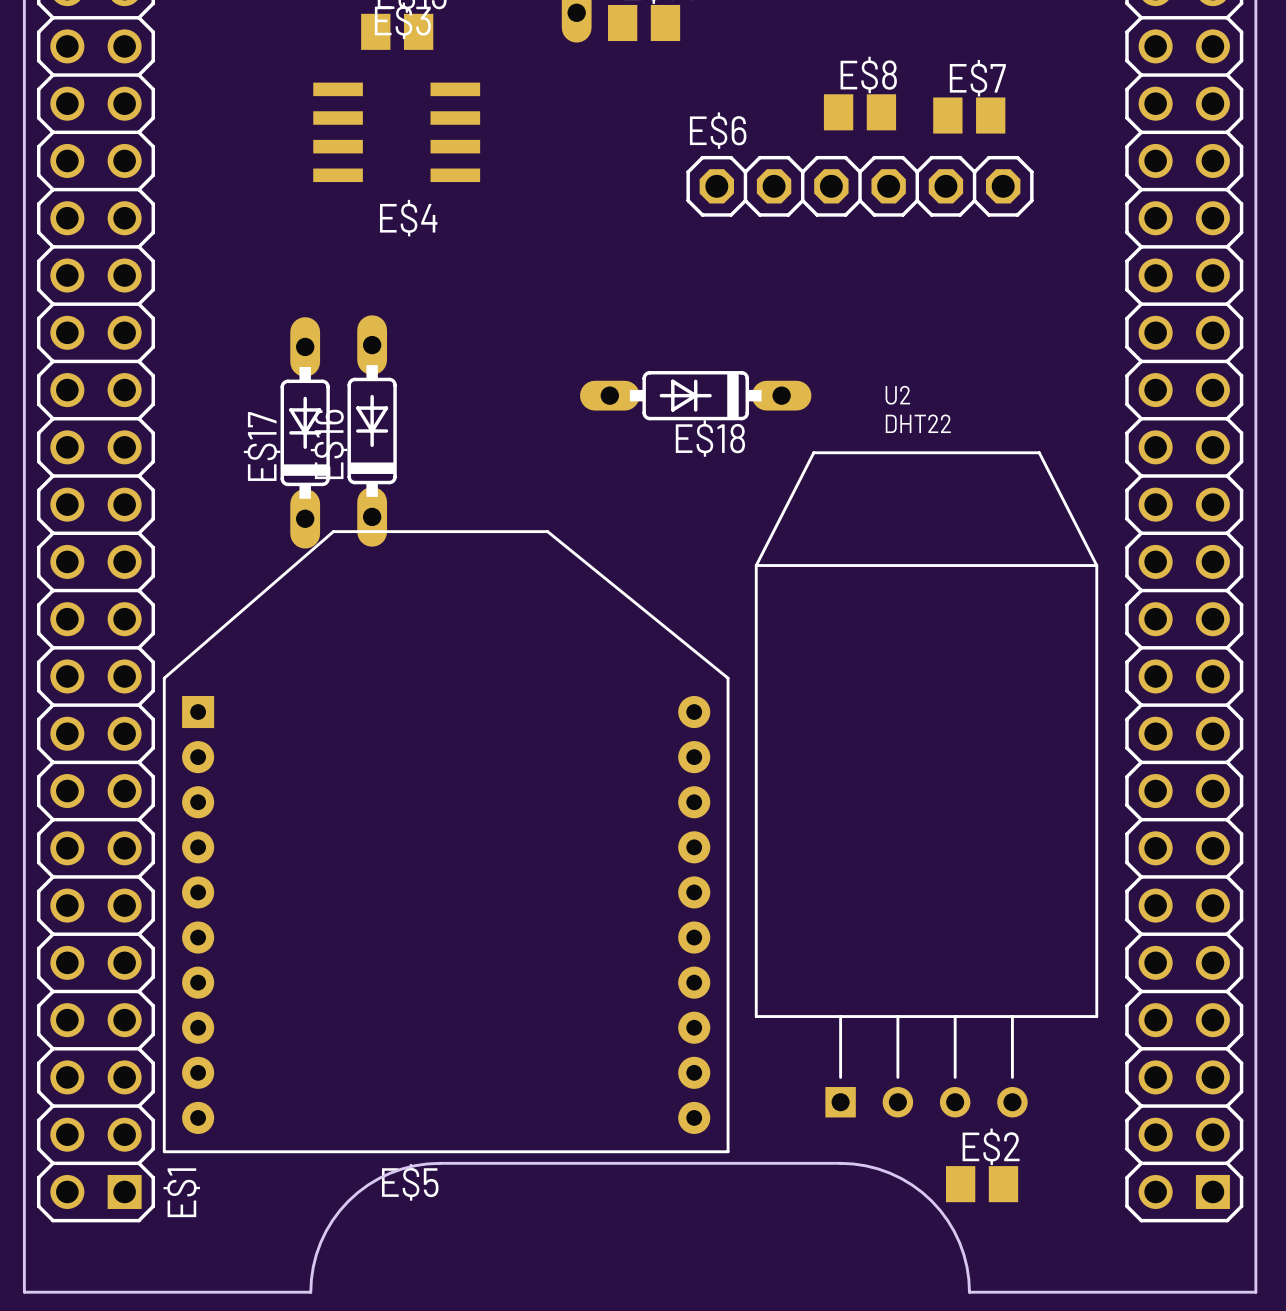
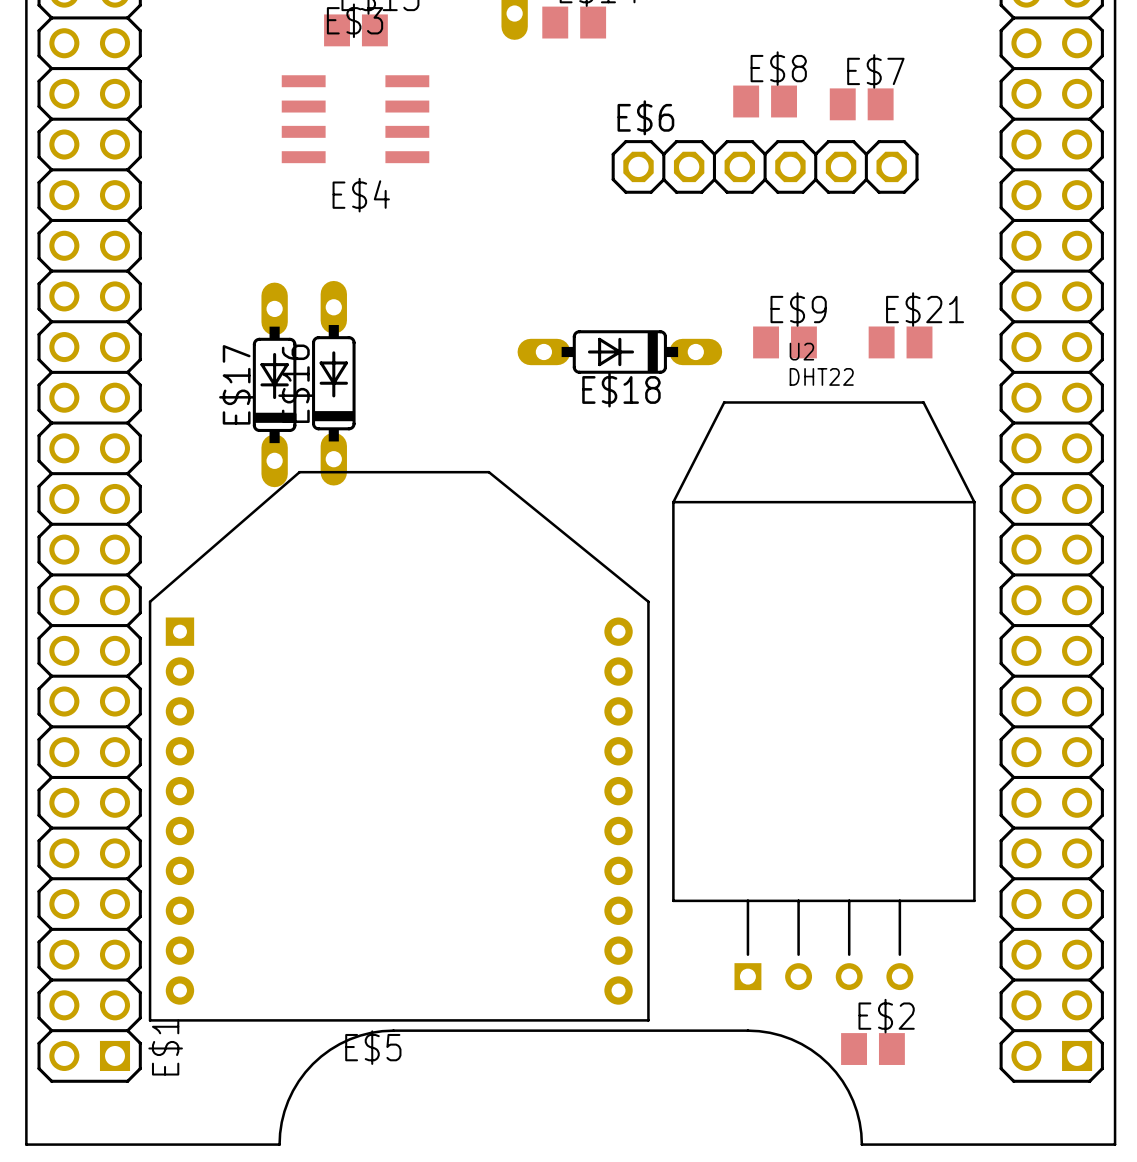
E$9: none -> (785, 342)
E$21: none -> (900, 342)

